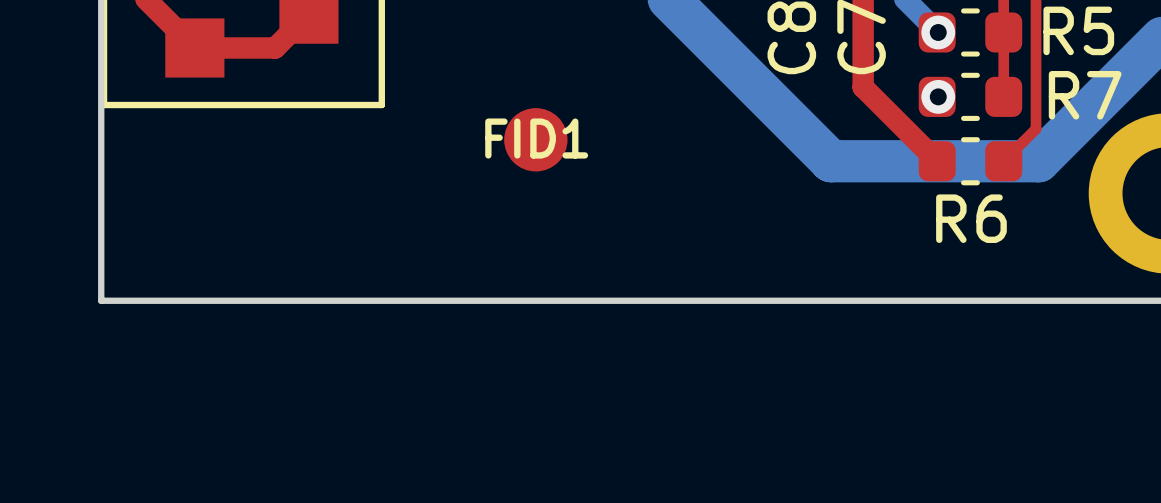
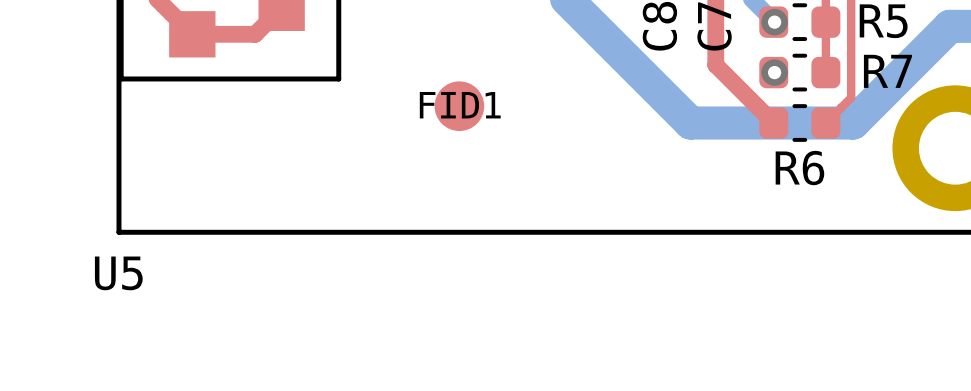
U5: none -> (118, 273)

